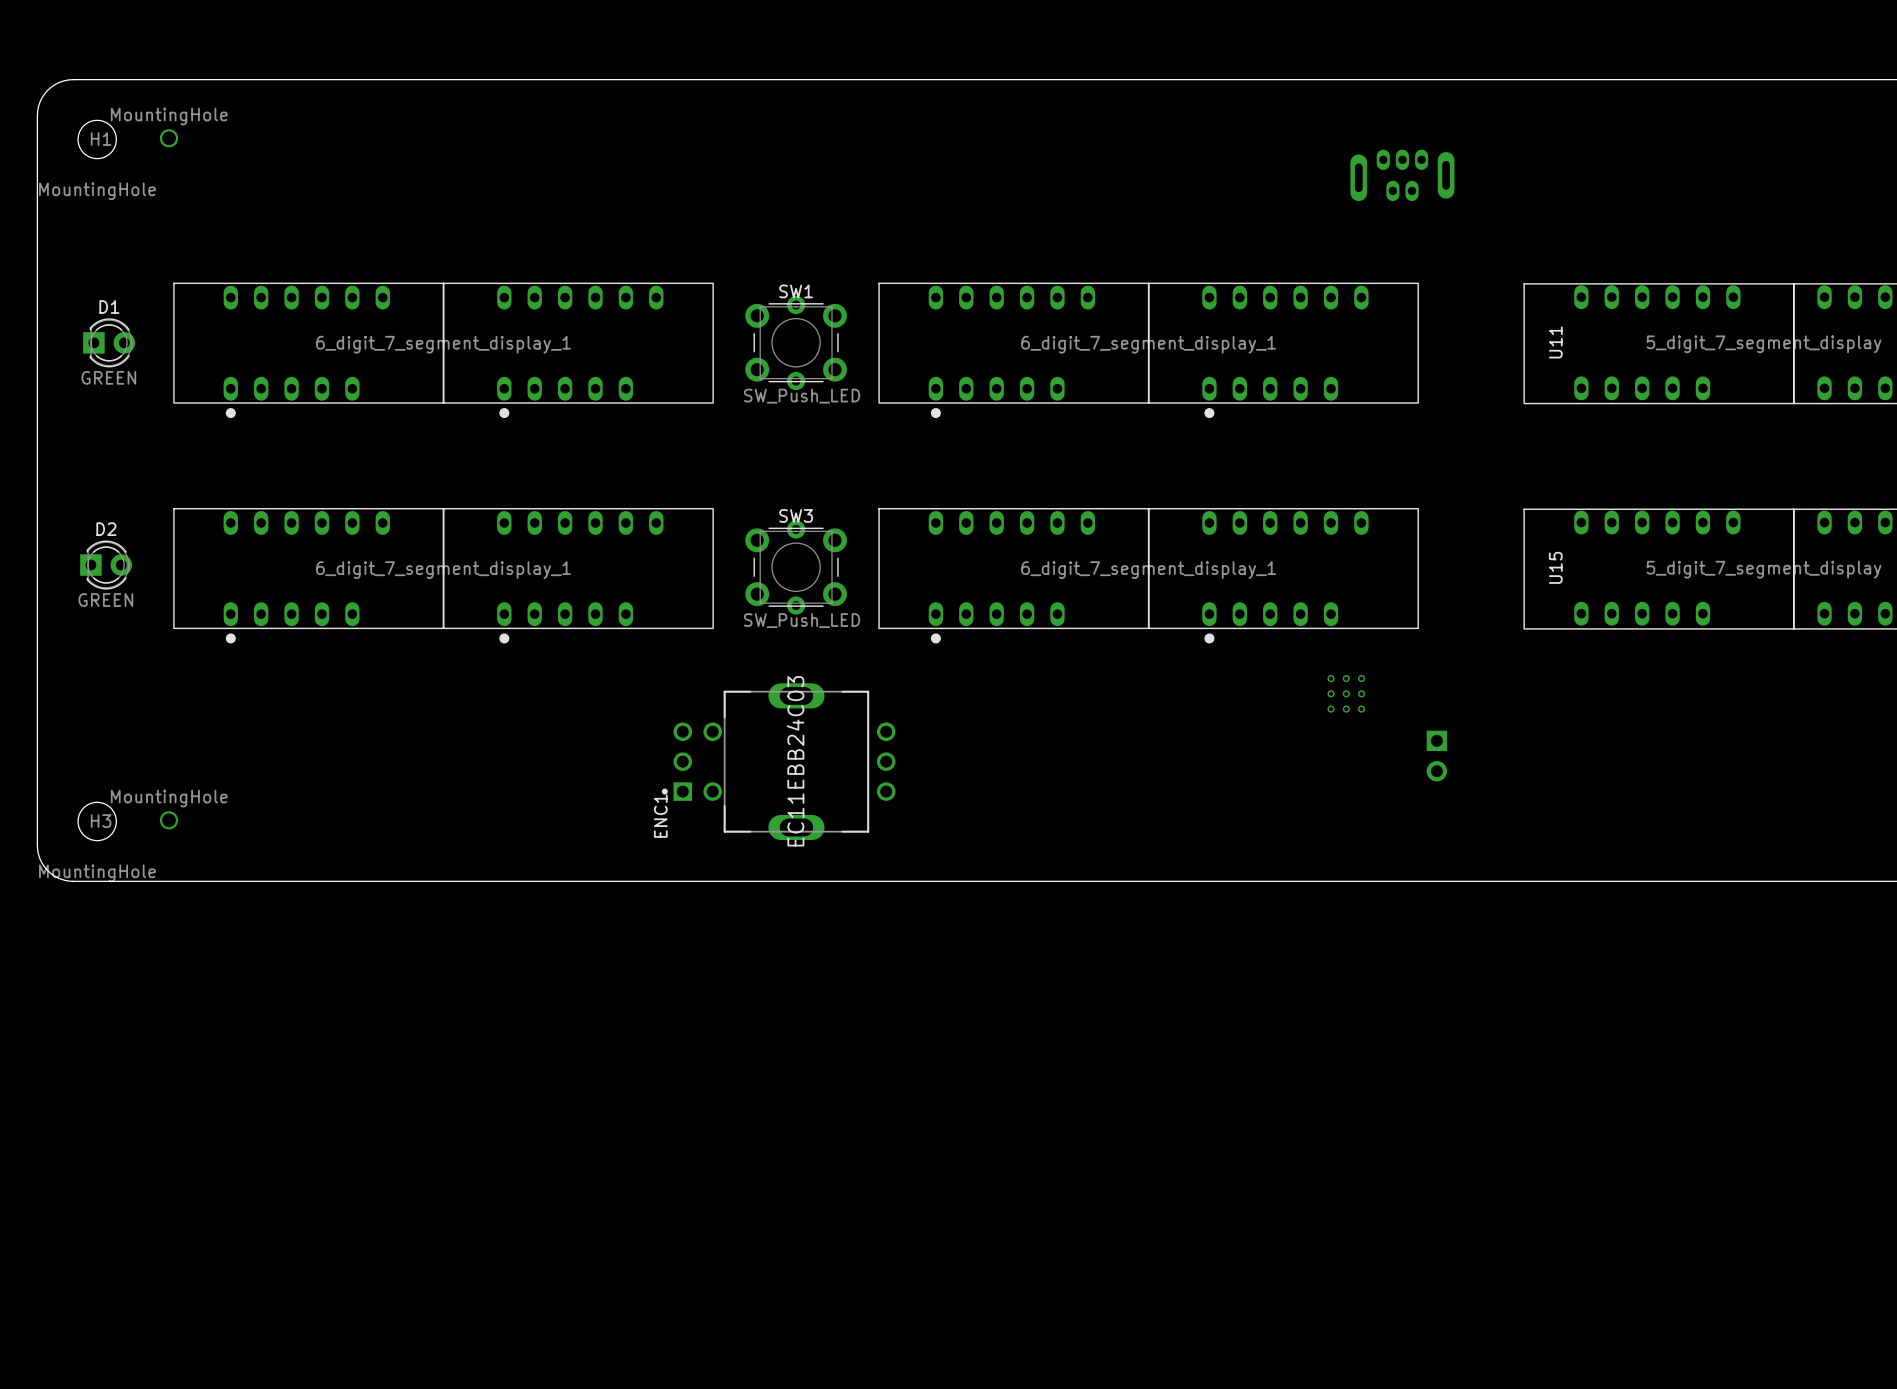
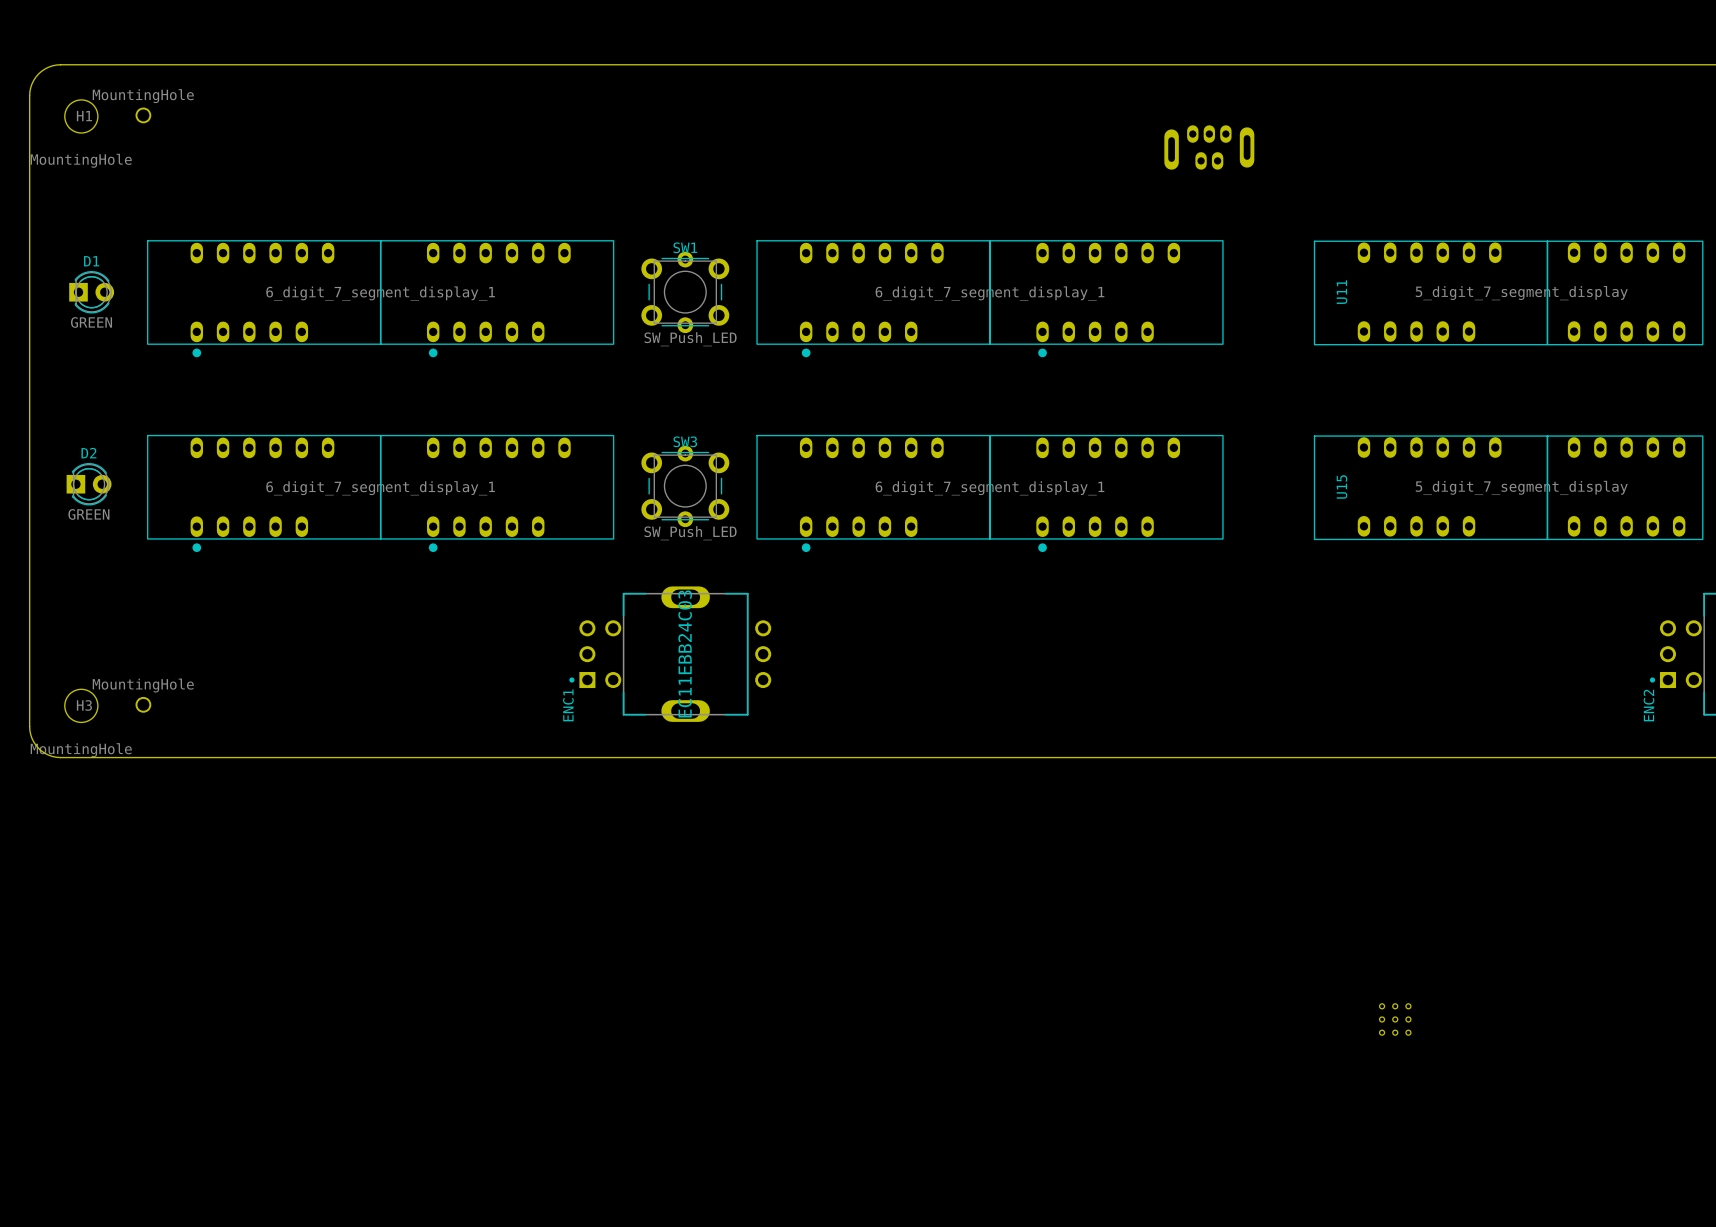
part: (1346, 693) -> none
part: (1436, 756) -> none
part: none -> (1395, 1019)

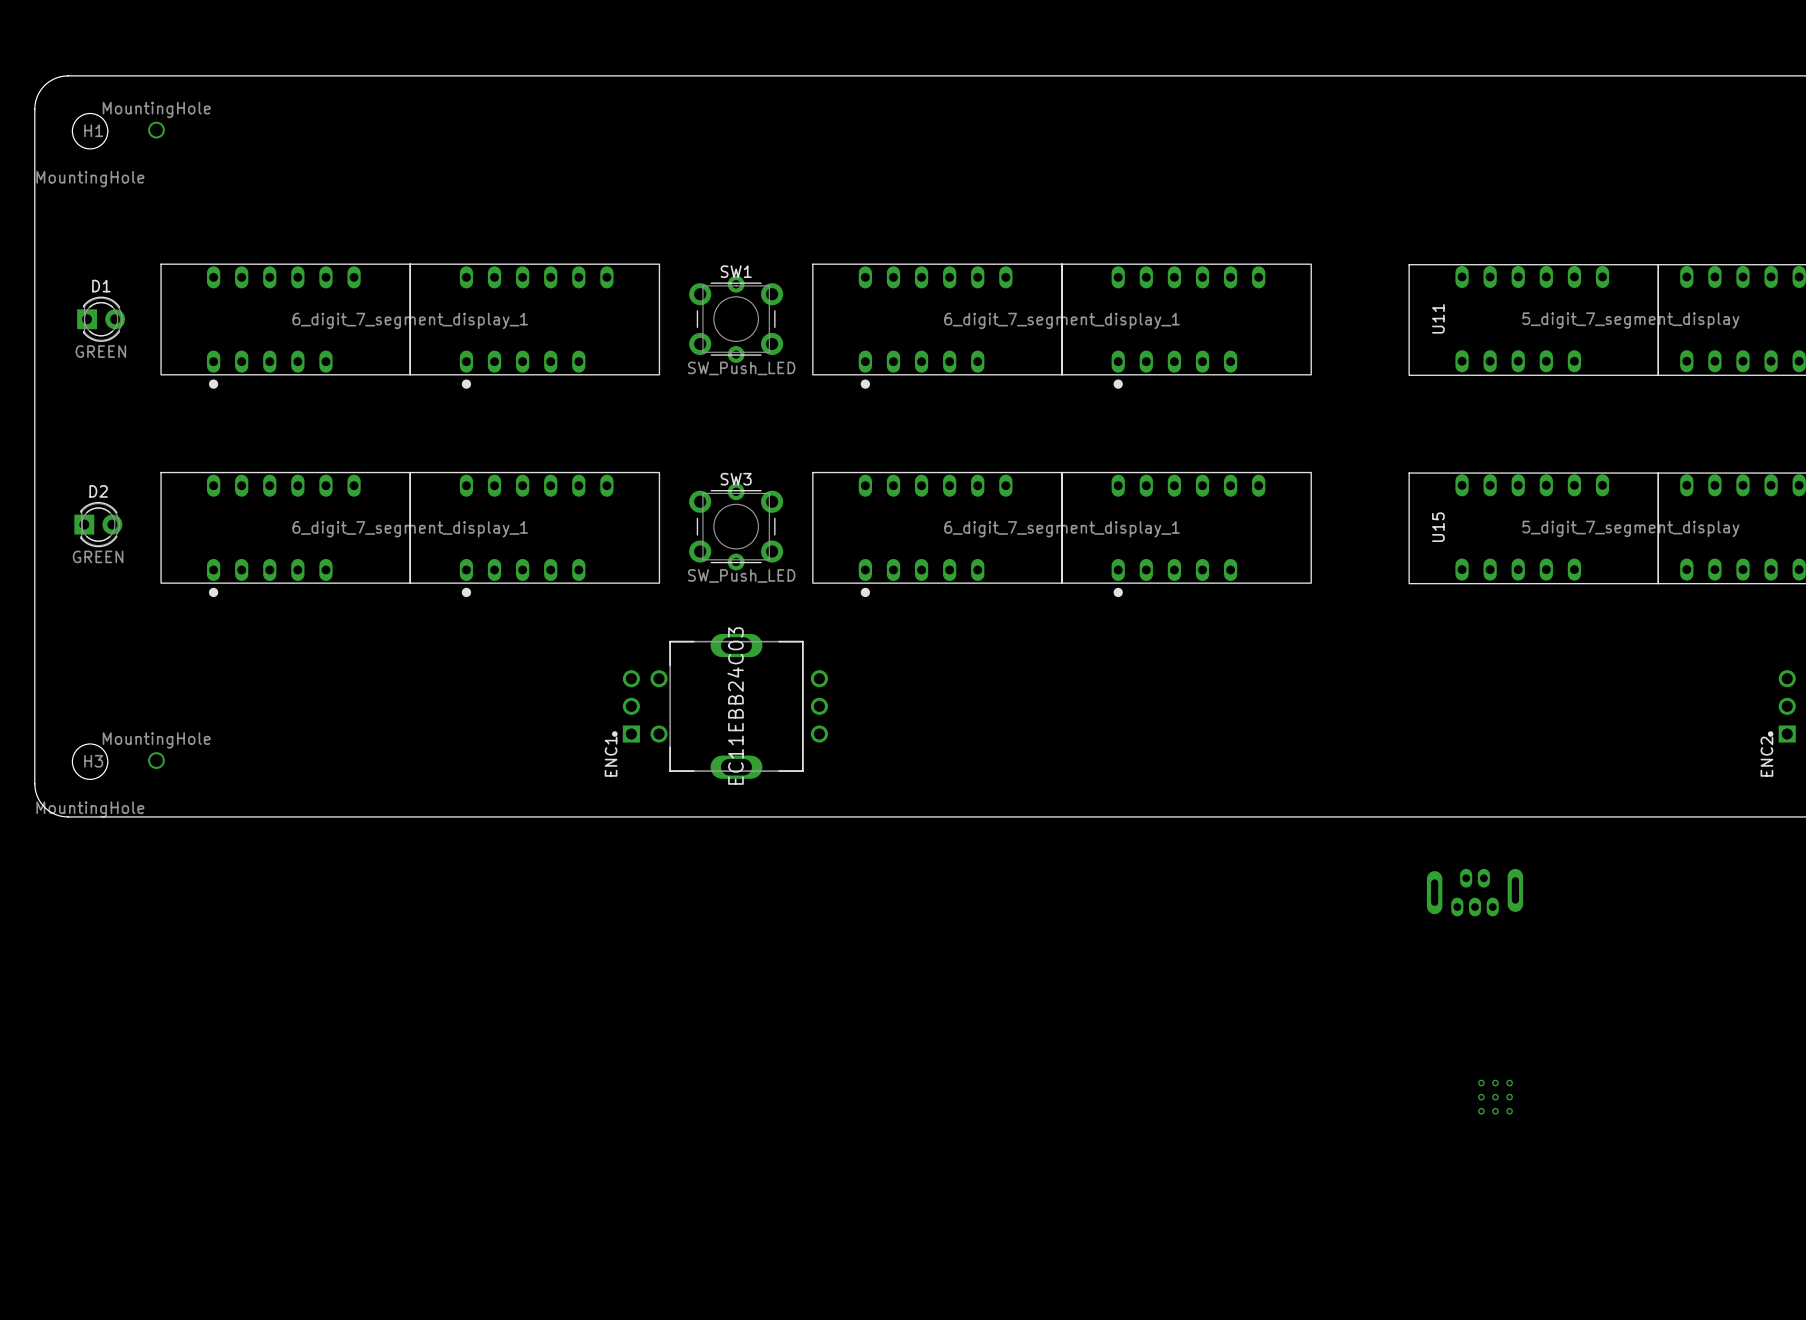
part: (1209, 147) -> none
part: none -> (1475, 892)

